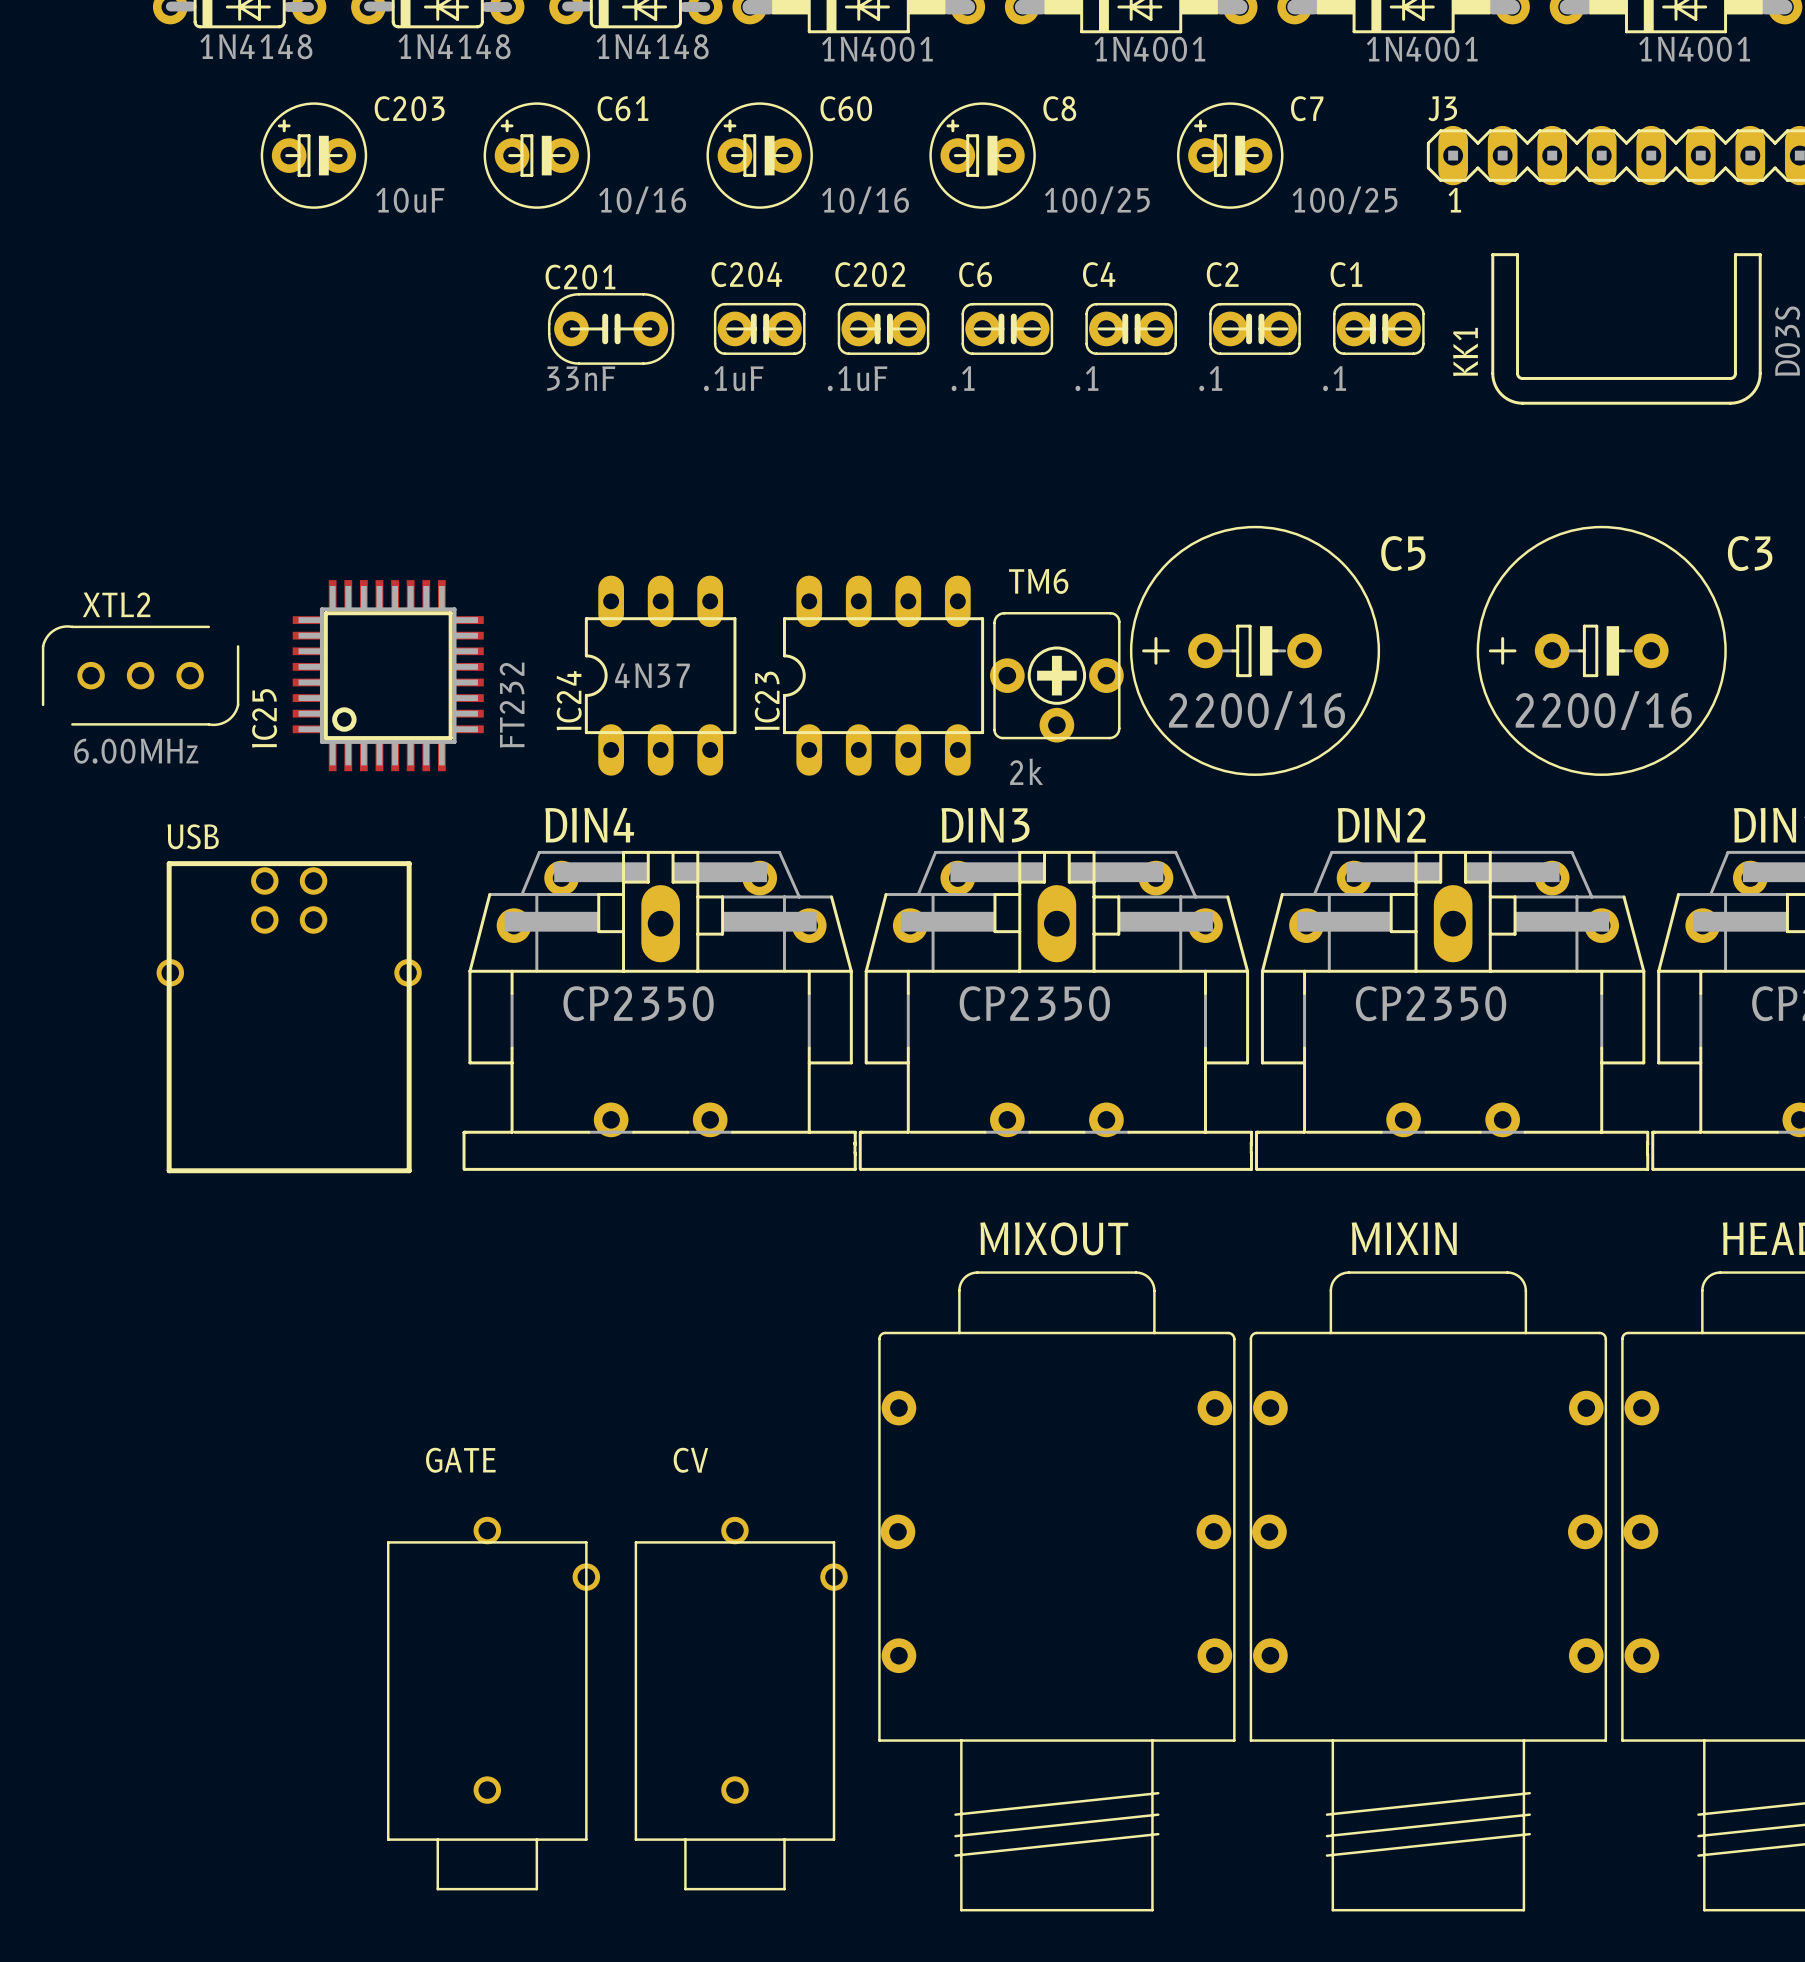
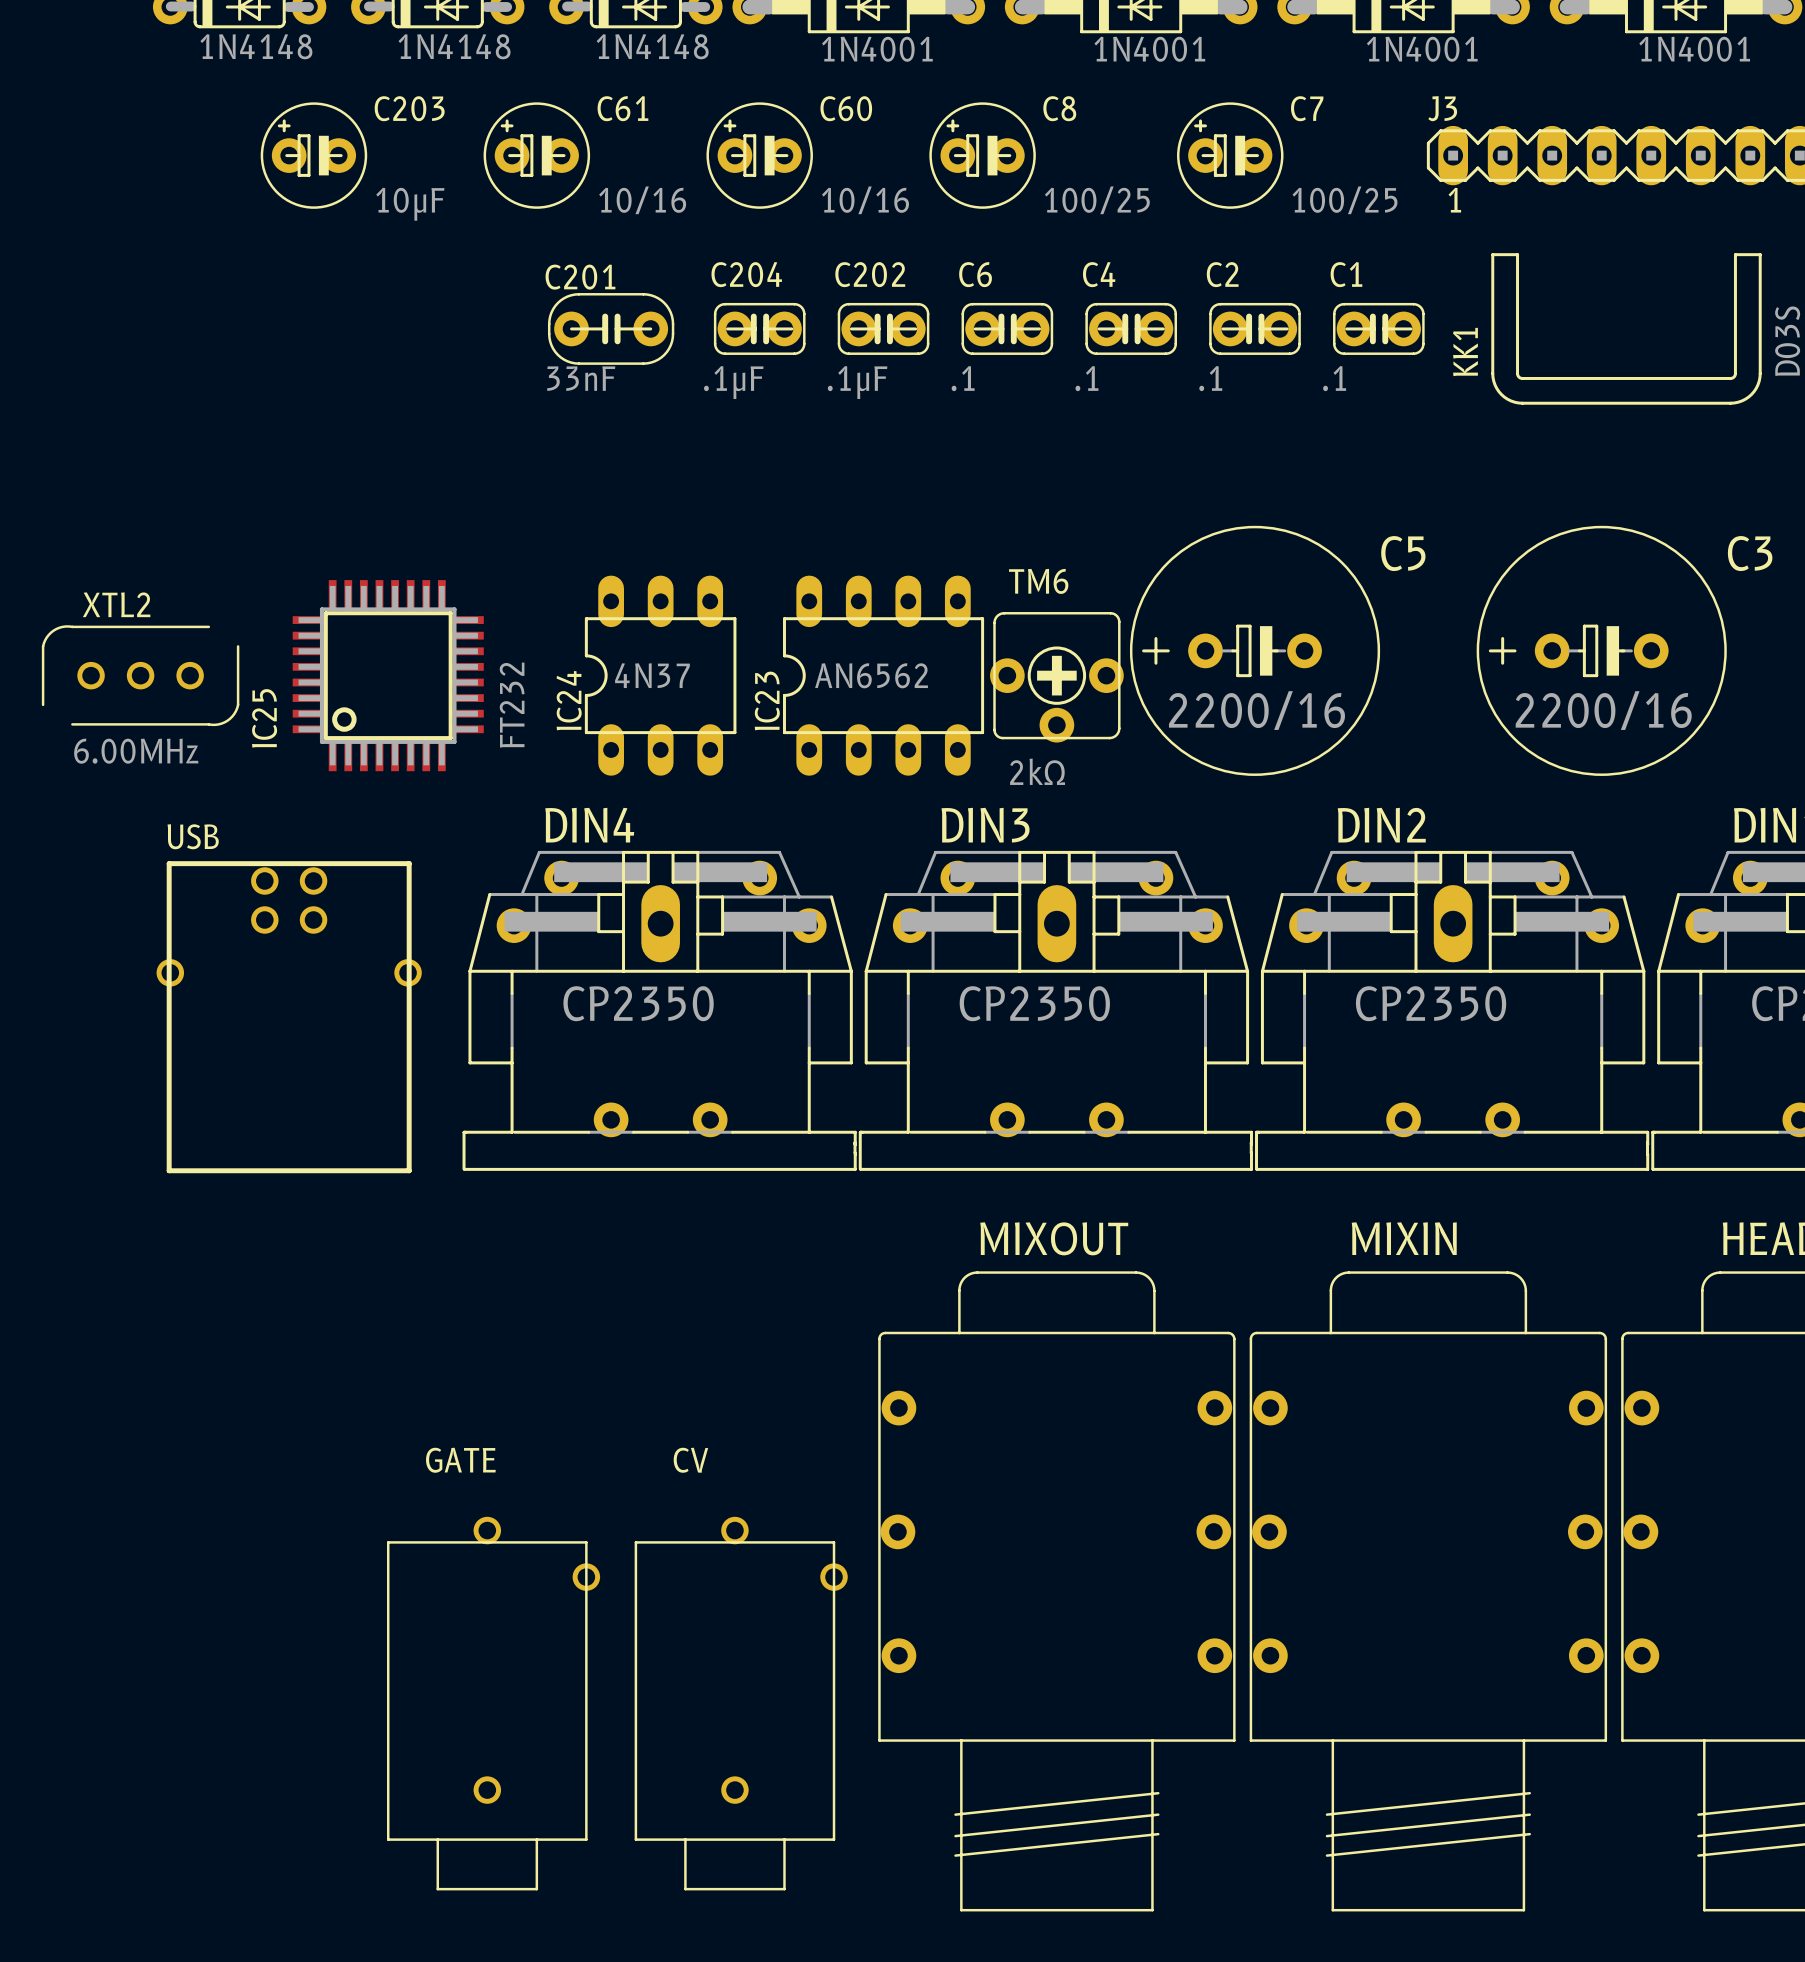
C203 value: 10uF (410, 200) -> 10μF (410, 204)
C204 value: .1uF (733, 378) -> .1μF (733, 382)
C202 value: .1uF (857, 378) -> .1μF (857, 382)
IC23 value: none -> AN6562 (871, 675)
TM6 value: 2k (1026, 771) -> 2kΩ (1037, 771)

